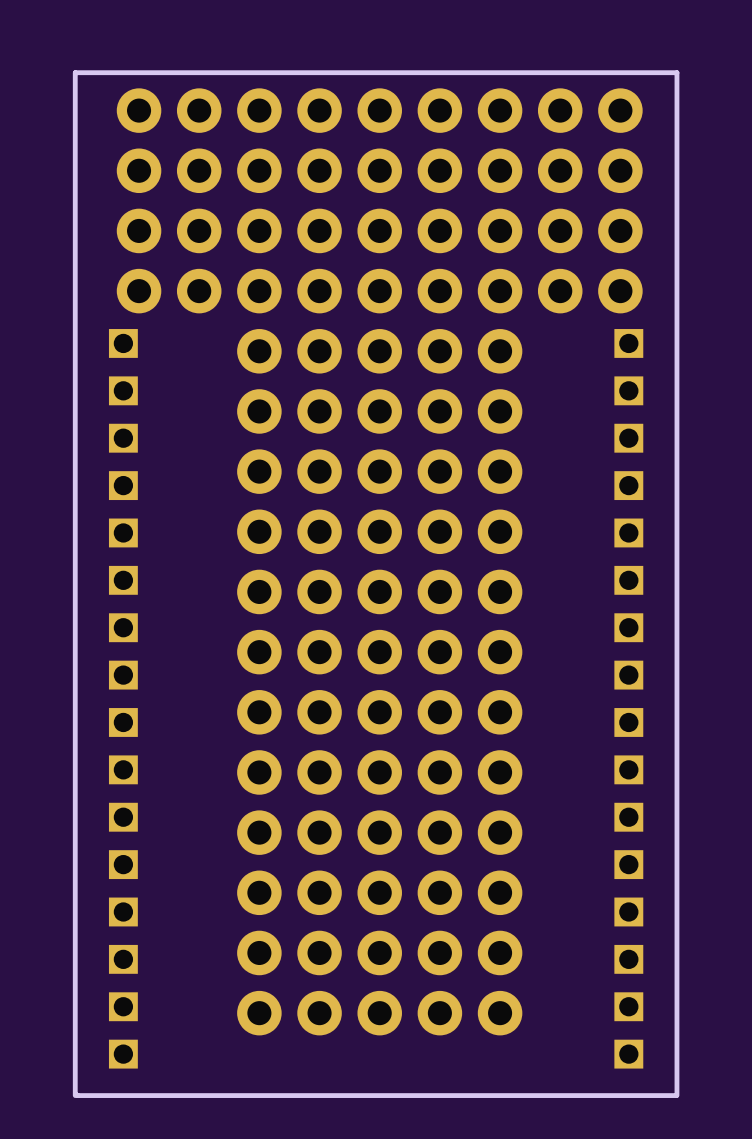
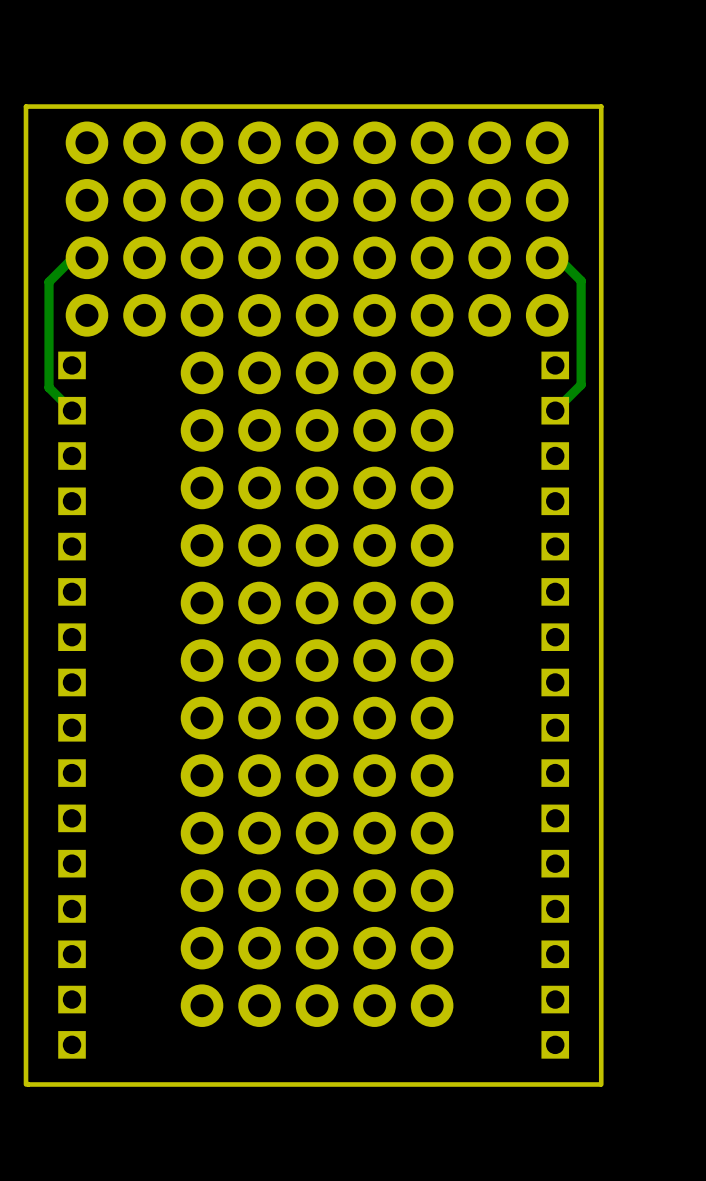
track: none -> (86, 257) (73, 257) (49, 282) (49, 387) (72, 410)
track: none -> (547, 257) (558, 257) (581, 280) (581, 384) (555, 410)

